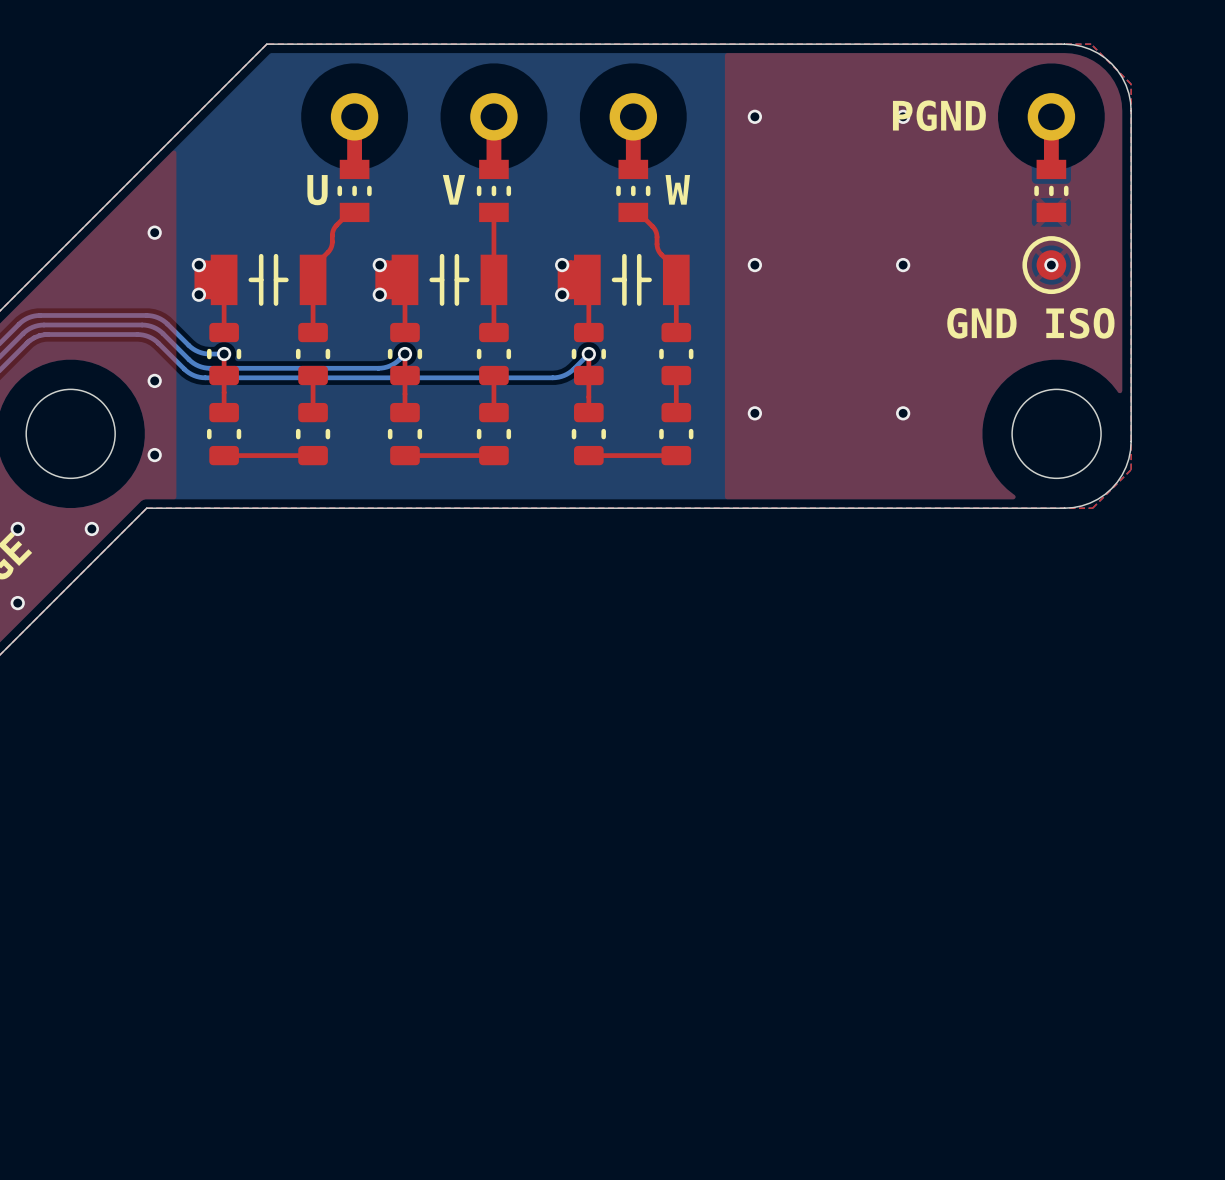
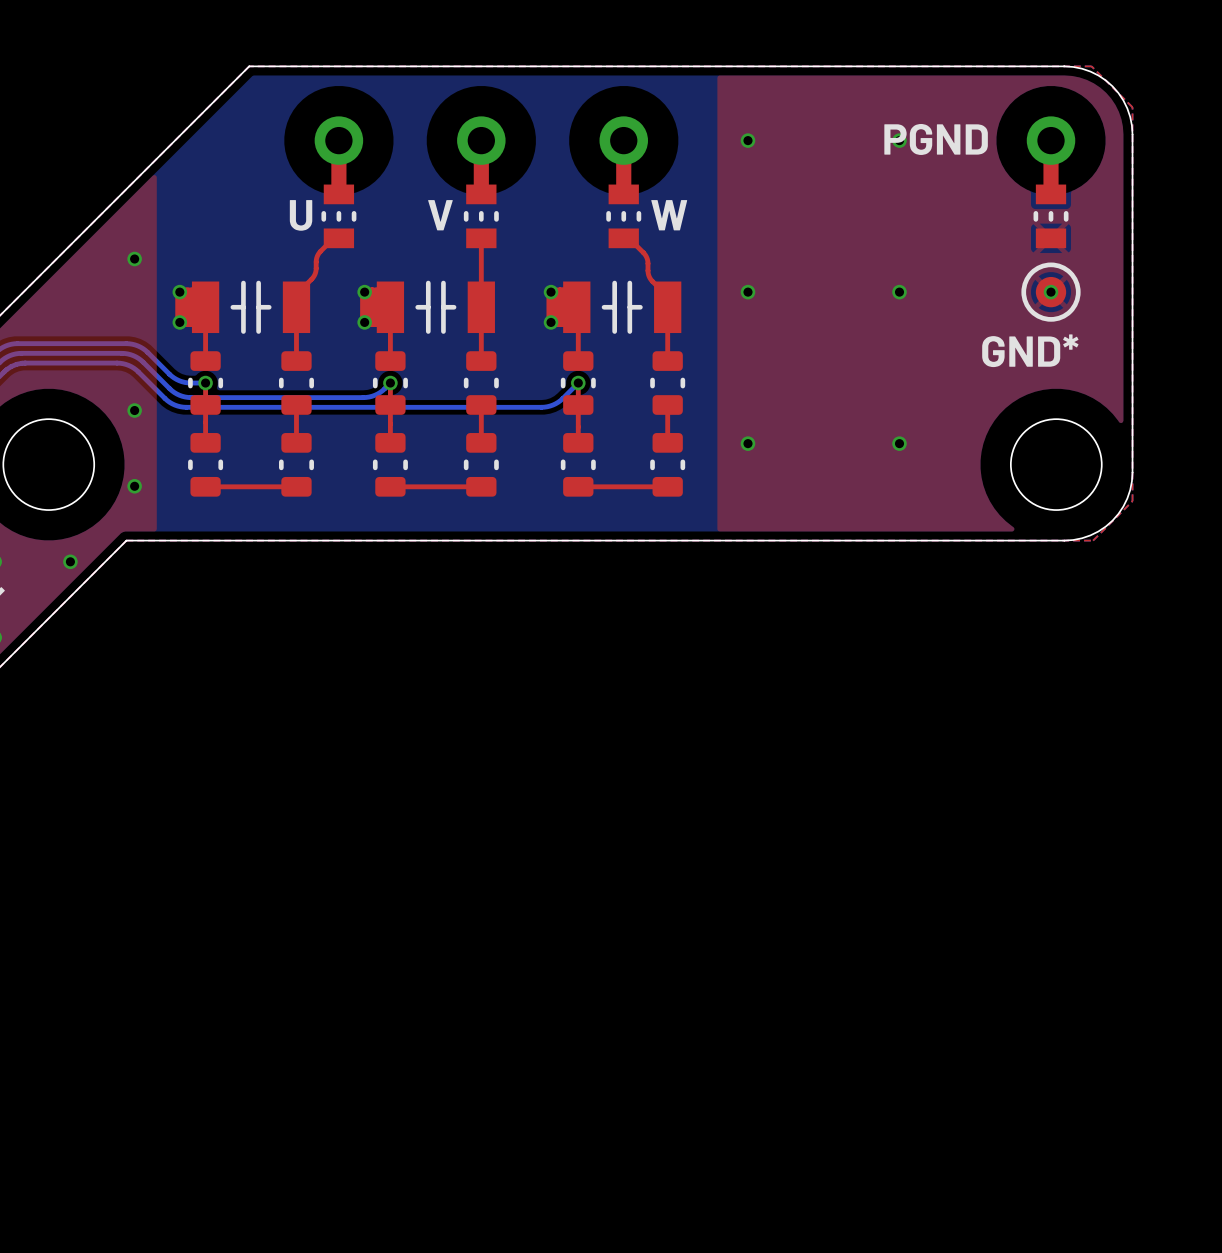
part value: GND ISO (1030, 323) -> GND* (1030, 350)

